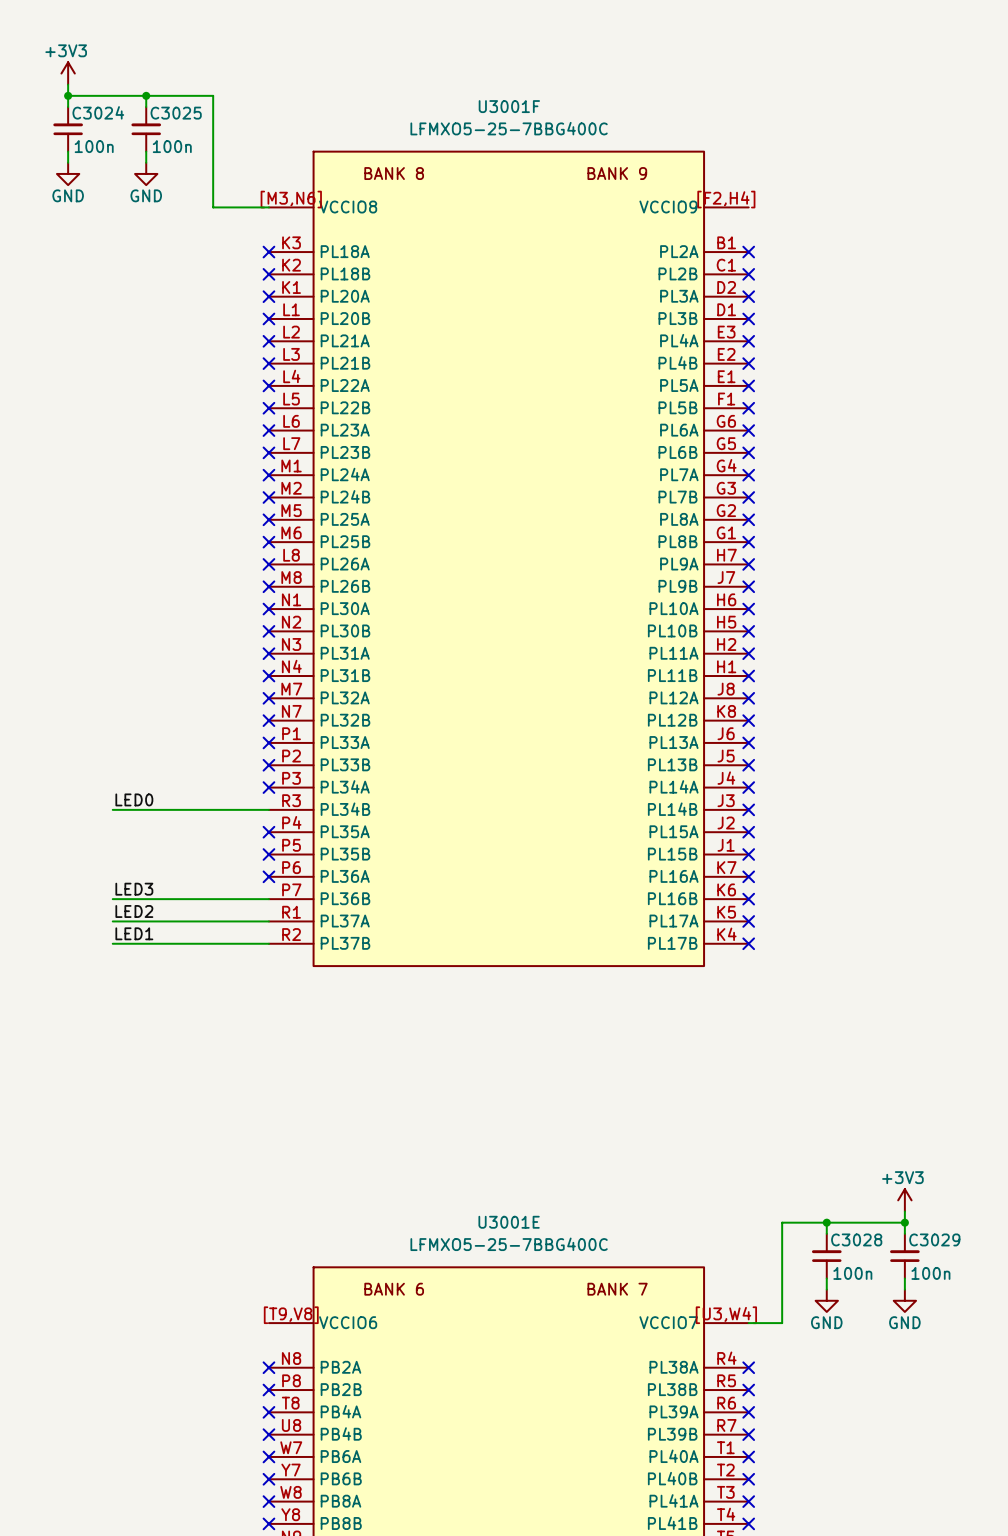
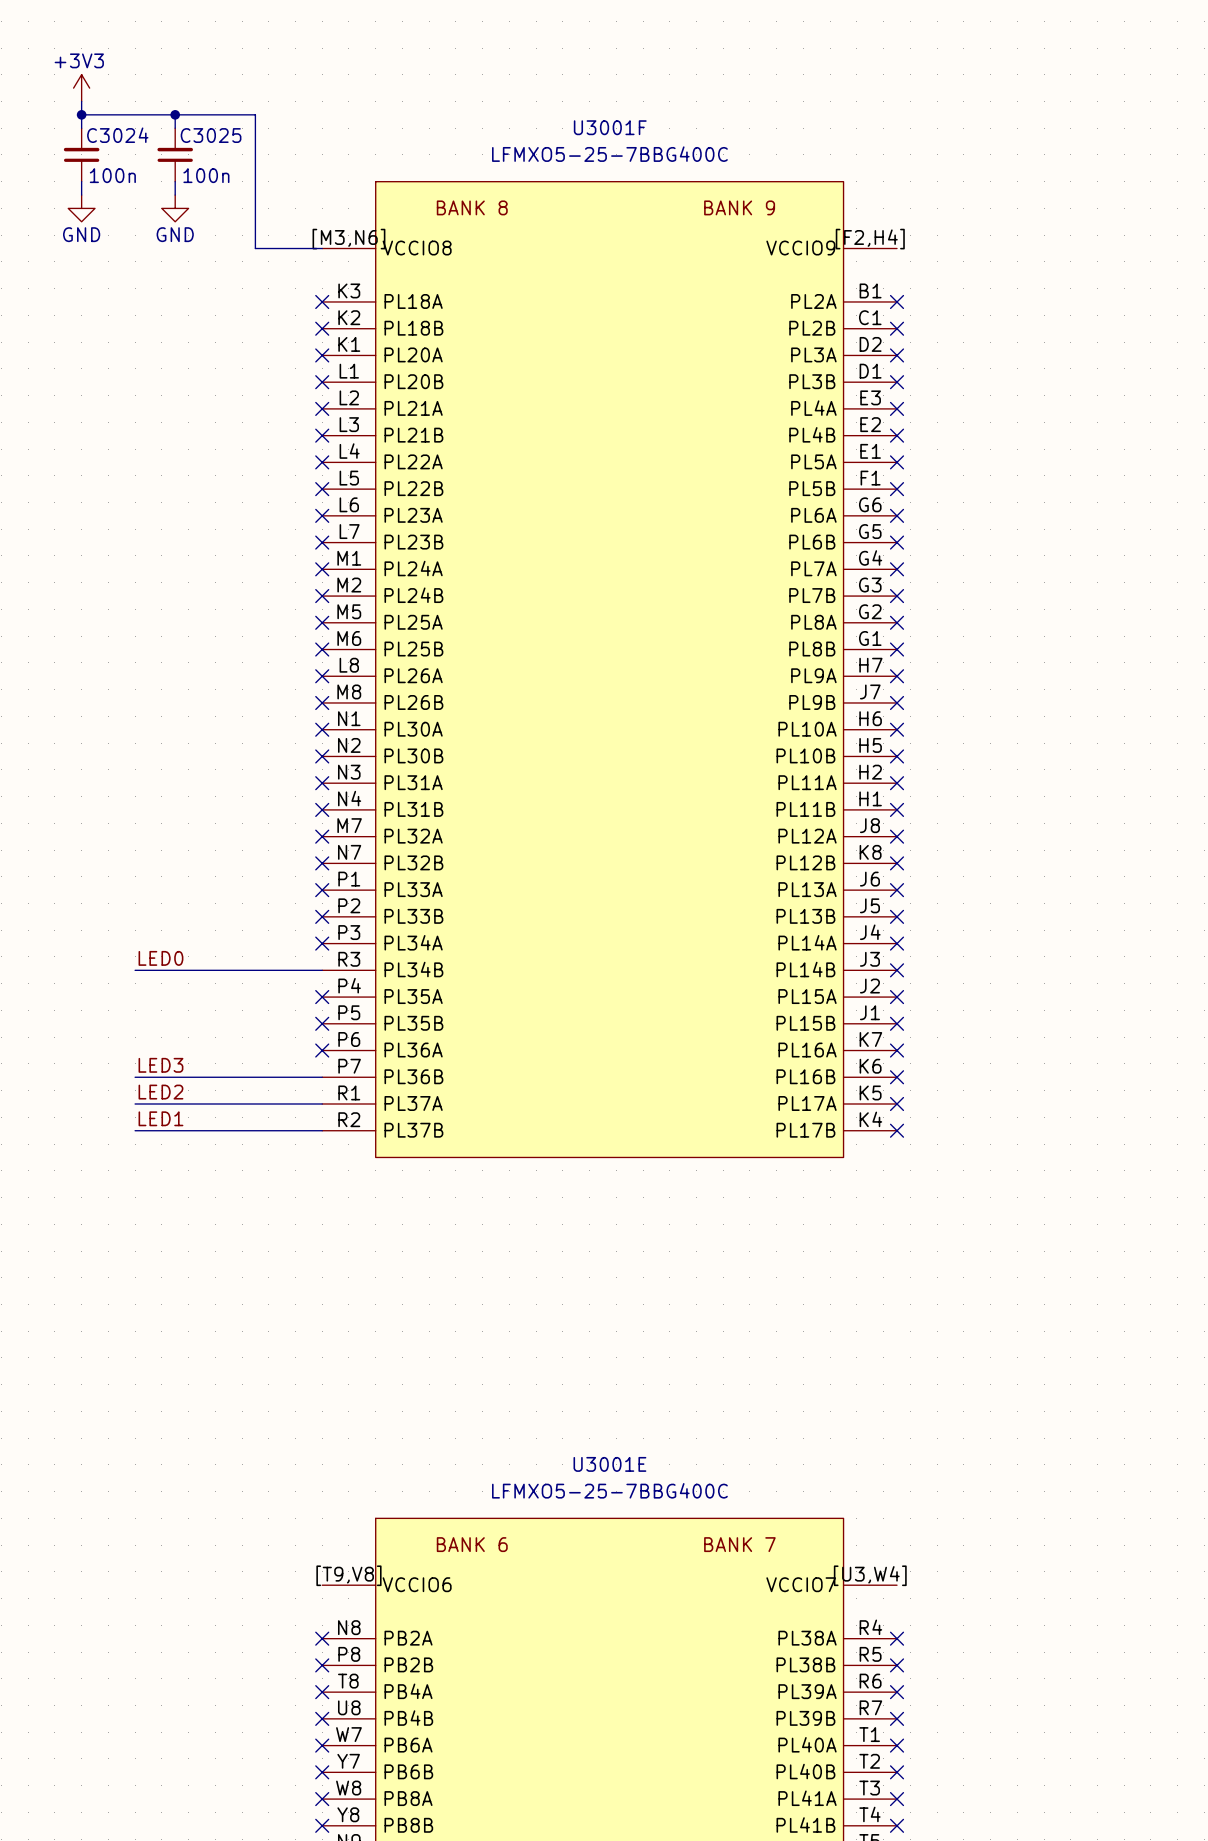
power symbol: +3V3 (904, 1200) -> none
wire: (904, 1211) (904, 1233) -> none
wire: (826, 1222) (826, 1233) -> none
junction: (826, 1222) -> none
wire: (904, 1222) (782, 1222) (782, 1323) (748, 1323) -> none
junction: (904, 1222) -> none
C3028: (826, 1256) -> none
C3029: (904, 1256) -> none
wire: (826, 1278) (826, 1289) -> none
wire: (904, 1278) (904, 1289) -> none
power symbol: GND (826, 1300) -> none
power symbol: GND (904, 1300) -> none

